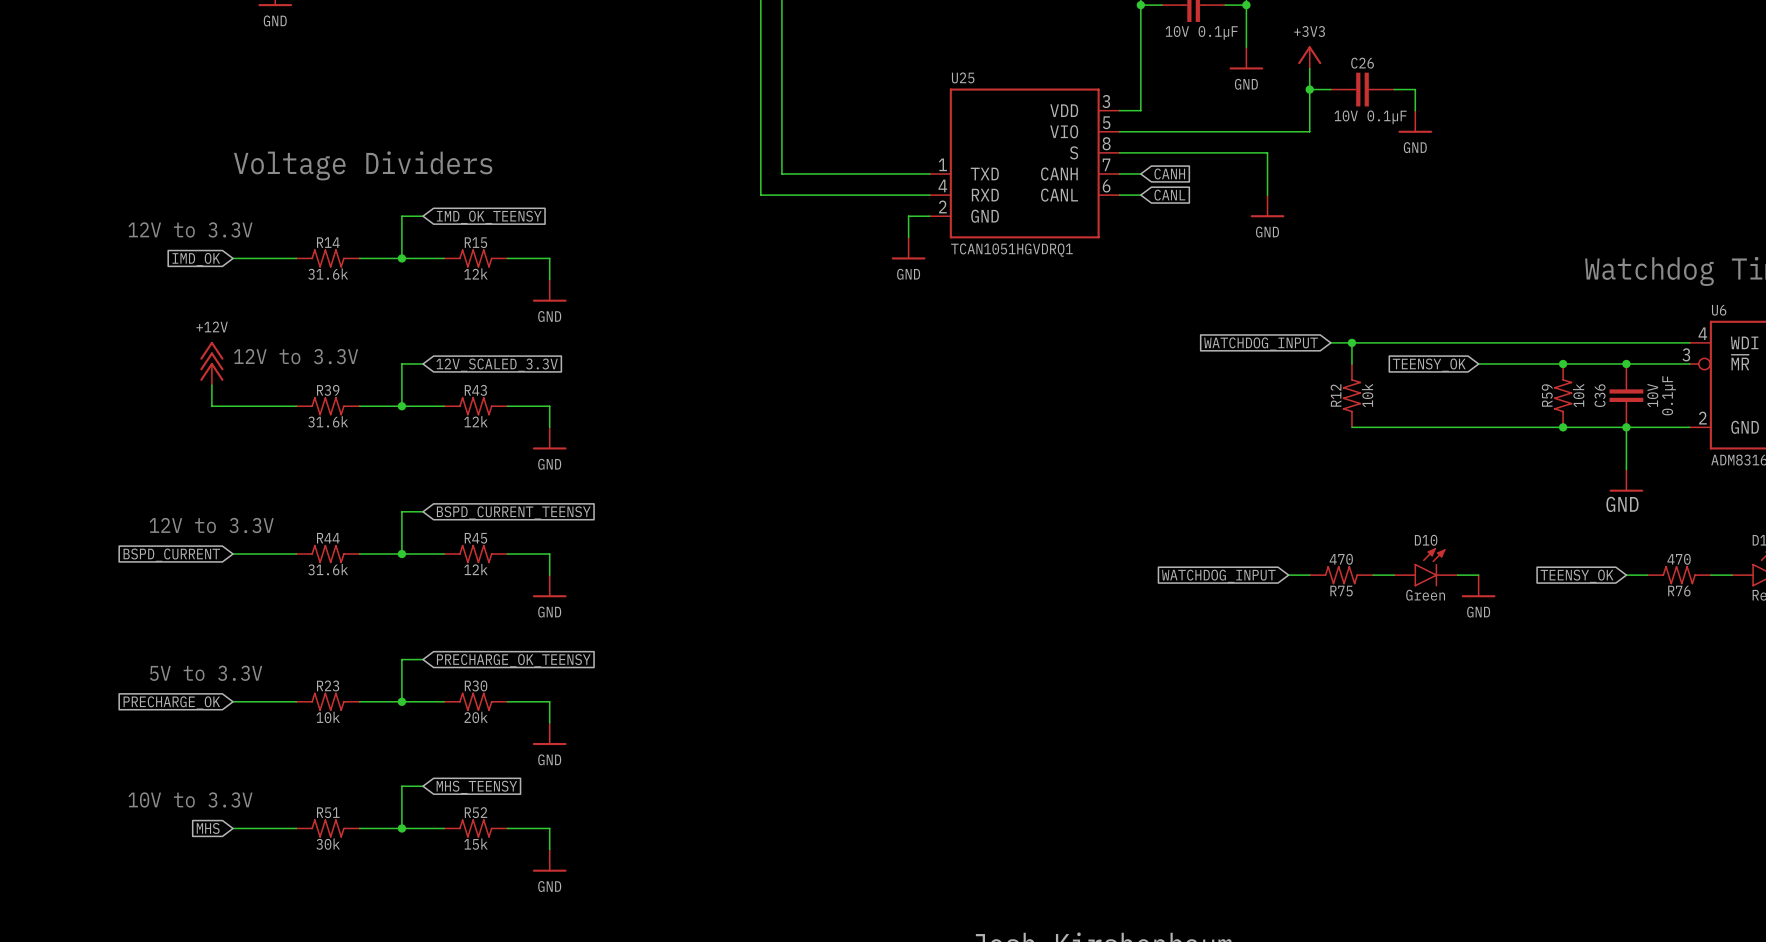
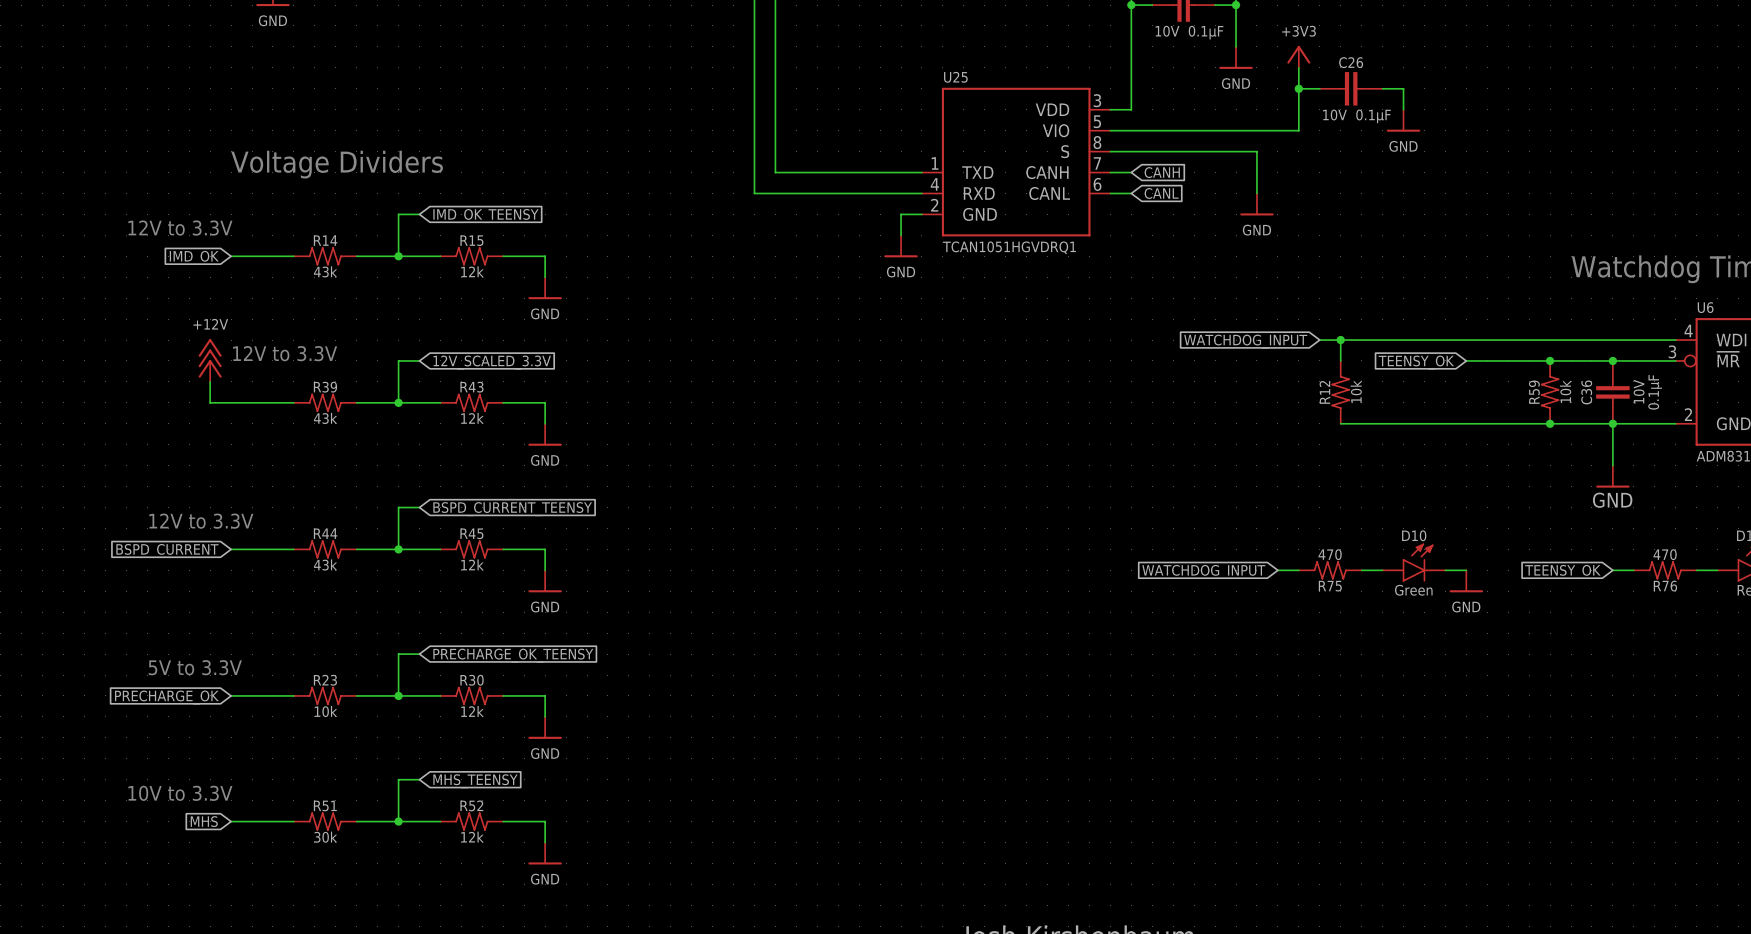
R14 text: 31.6k (328, 274) -> 43k (325, 271)
R39 text: 31.6k (328, 421) -> 43k (325, 418)
R44 text: 31.6k (328, 569) -> 43k (325, 564)
R30 text: 20k (476, 717) -> 12k (472, 711)
R52 text: 15k (475, 844) -> 12k (472, 837)

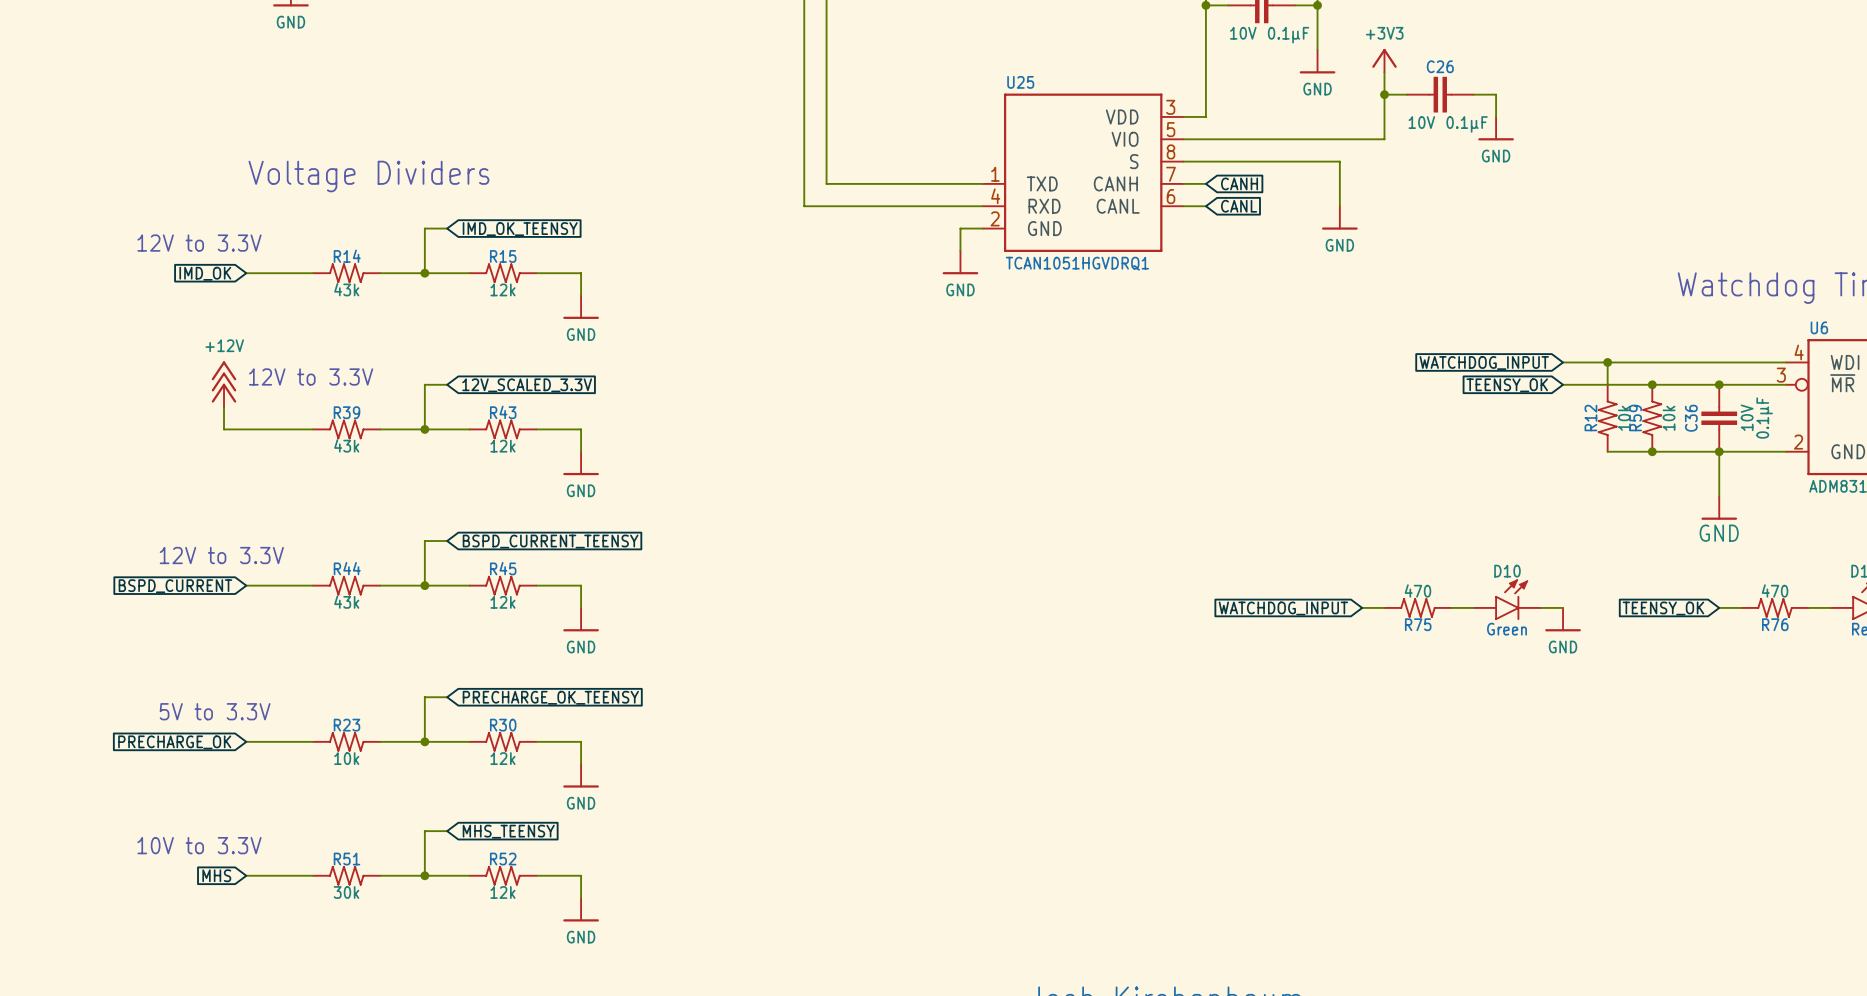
wire: (1319, 340) (1466, 340) -> none
wire: (1340, 340) (1340, 360) -> (1607, 362) (1607, 384)
junction: (1340, 340) -> none
junction: none -> (1607, 362)
global label position: WATCHDOG_INPUT (1245, 341) -> WATCHDOG_INPUT (1484, 363)
R12 position: (1340, 392) -> (1607, 418)
wire: (1340, 423) (1508, 423) -> none

